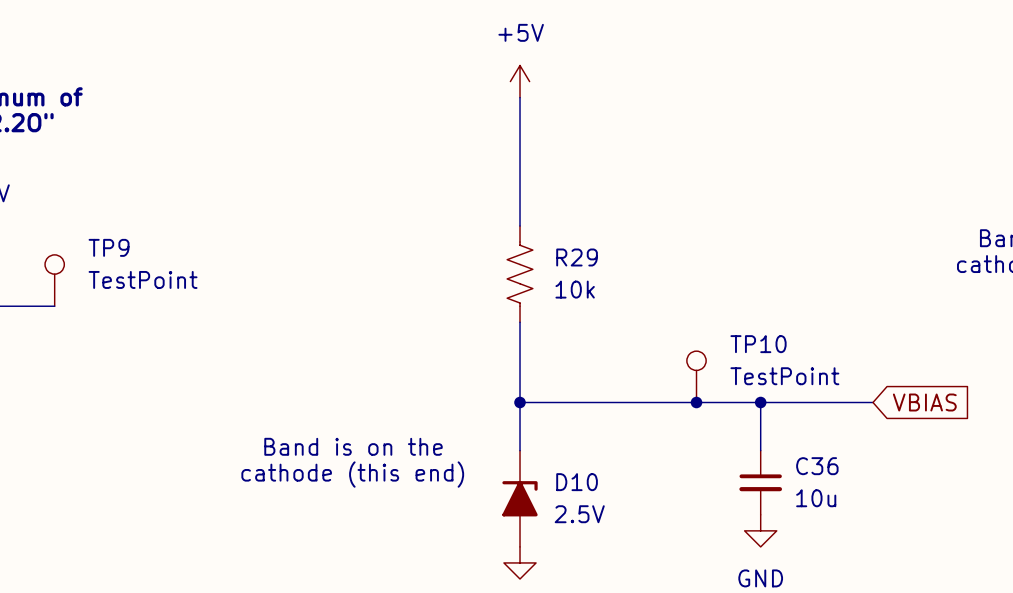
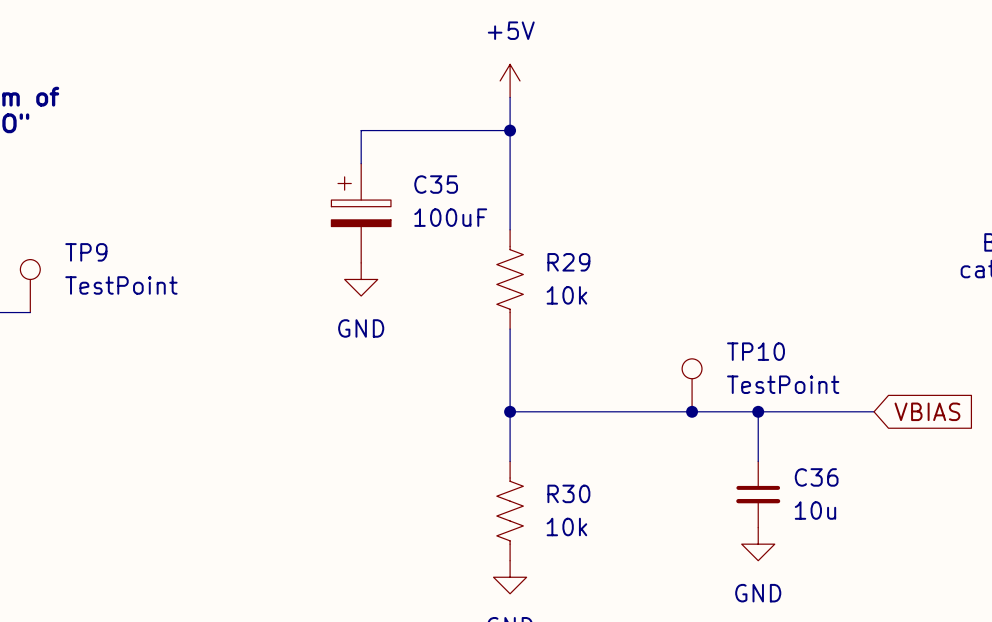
wire: none -> (510, 130) (361, 130) (361, 163)
junction: none -> (510, 130)
C35: none -> 100uF (361, 213)
power symbol: none -> GND (361, 279)
text: Band is on the (353, 446) -> none
text: cathode (this end) (352, 474) -> none
D10: 2.5V (520, 498) -> none
R30: none -> 10k (510, 511)

